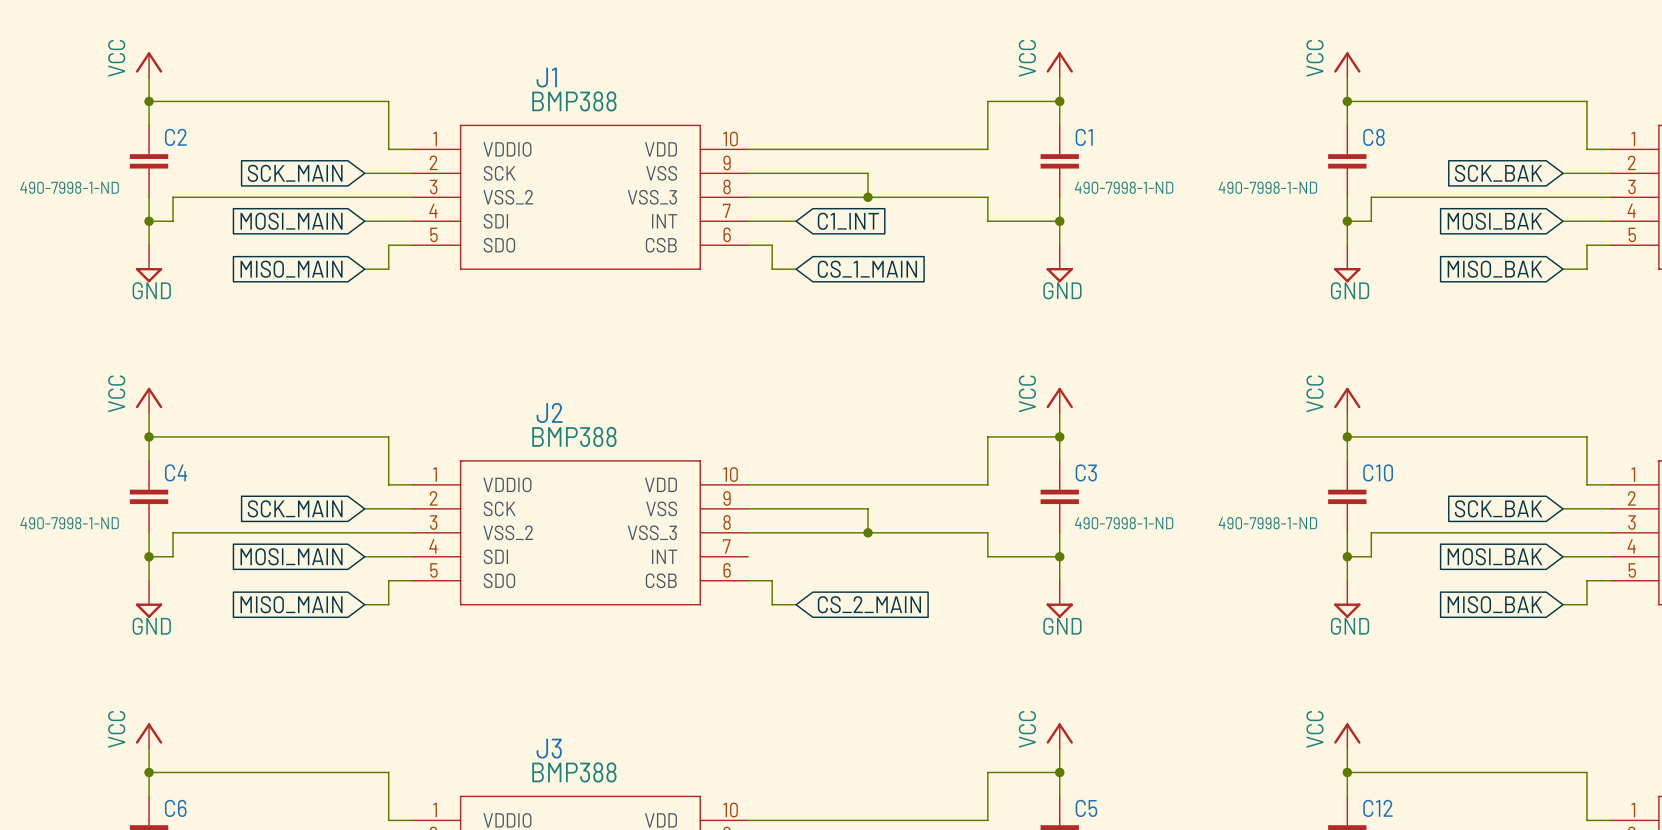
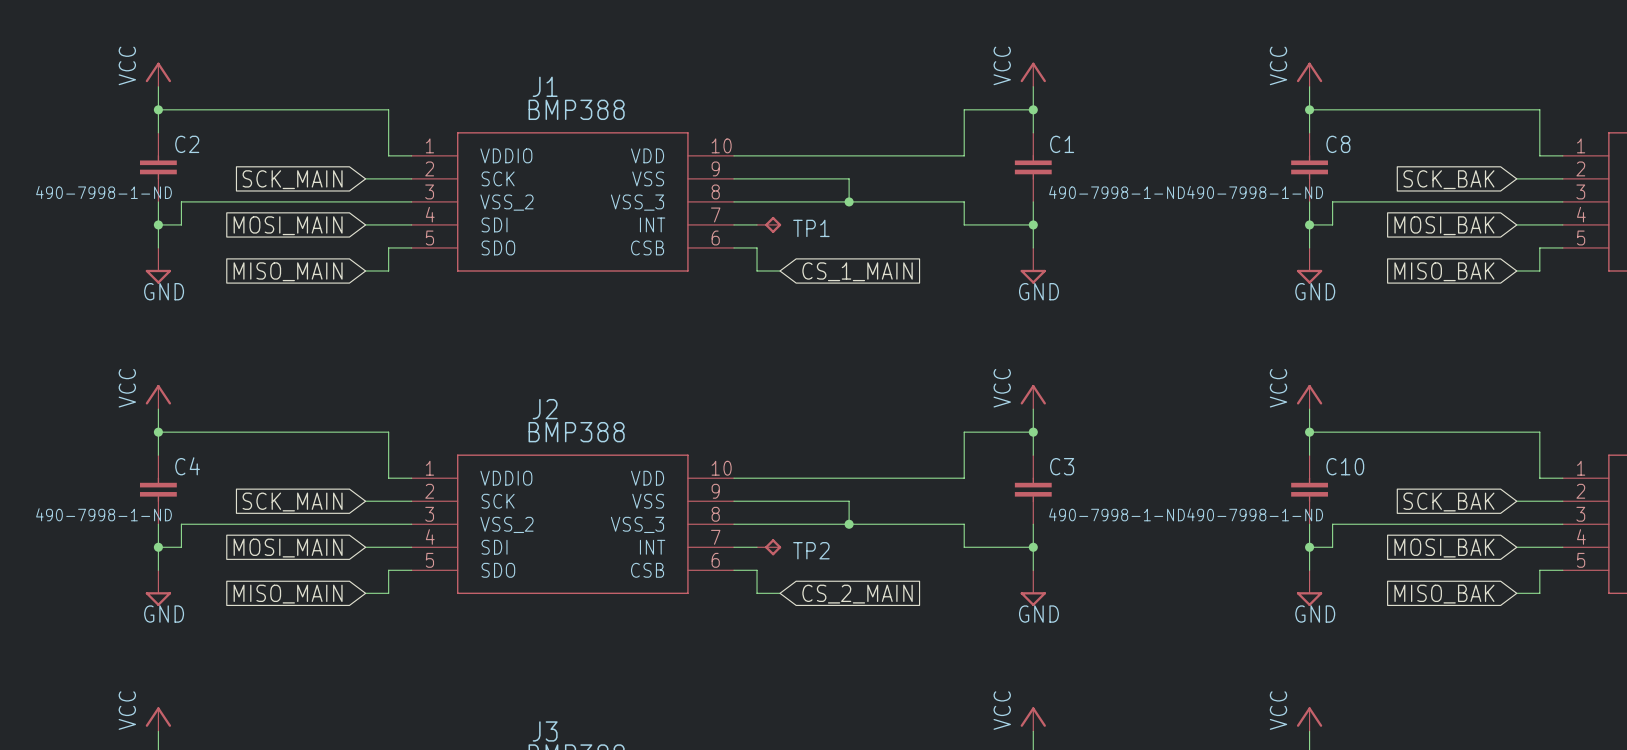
TP1: none -> (769, 224)
global label: C1_INT (848, 221) -> none
wire: none -> (733, 547) (757, 547)
TP2: none -> (769, 547)

